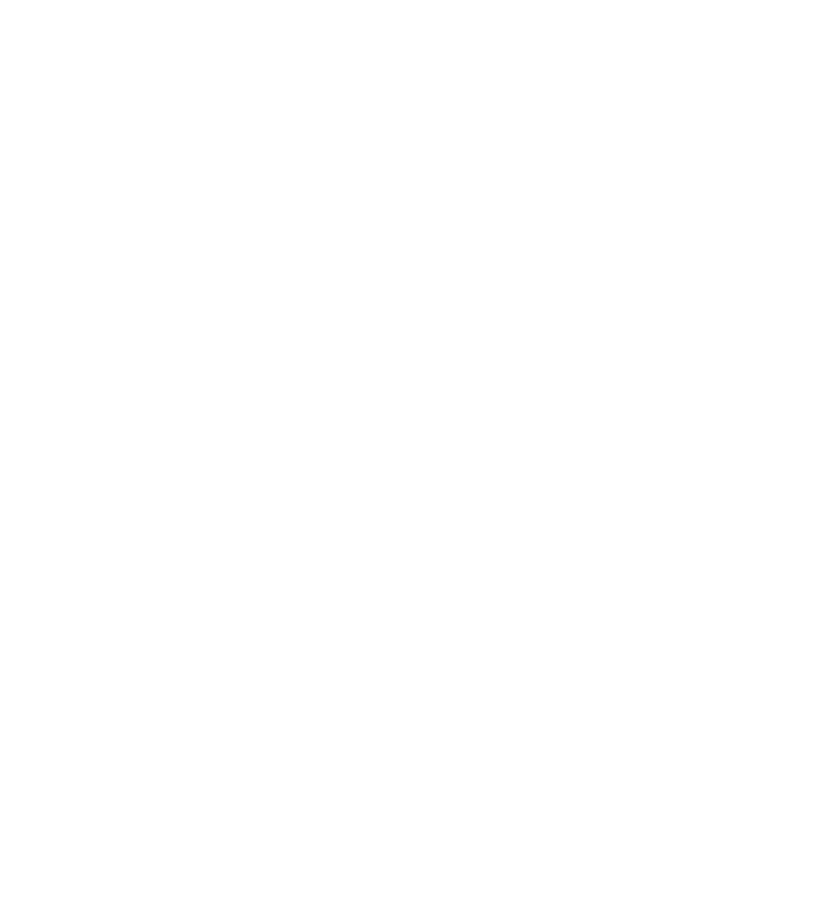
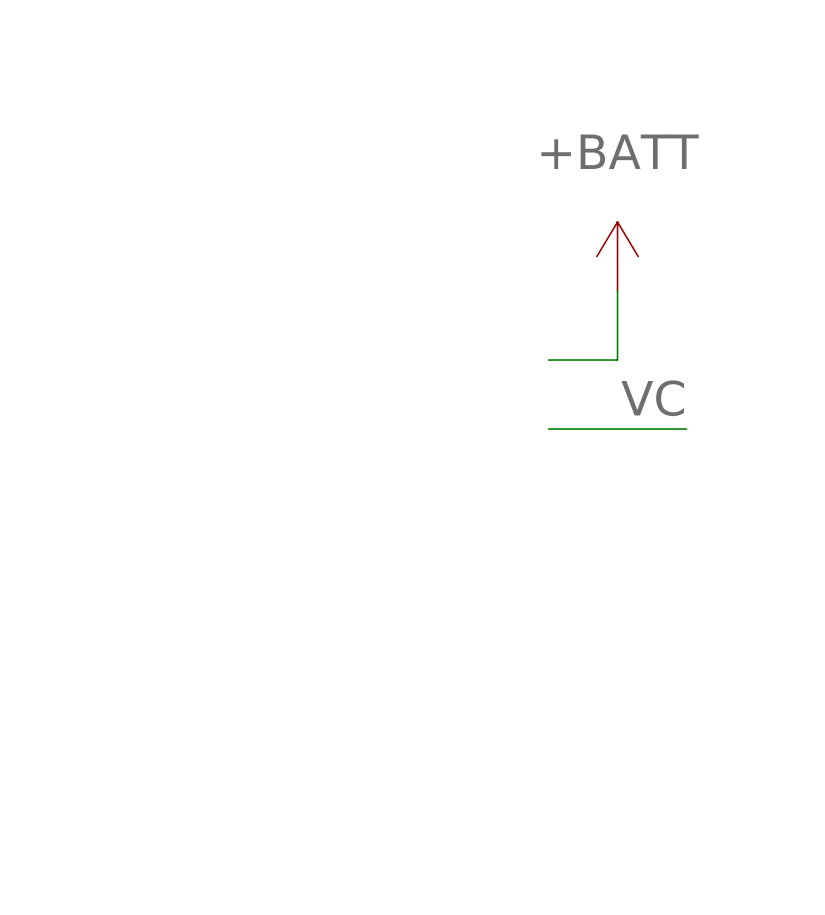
power symbol: none -> +BATT (617, 256)
wire: none -> (617, 291) (617, 360) (548, 360)
label: none -> VC (652, 398)
wire: none -> (548, 429) (686, 429)

